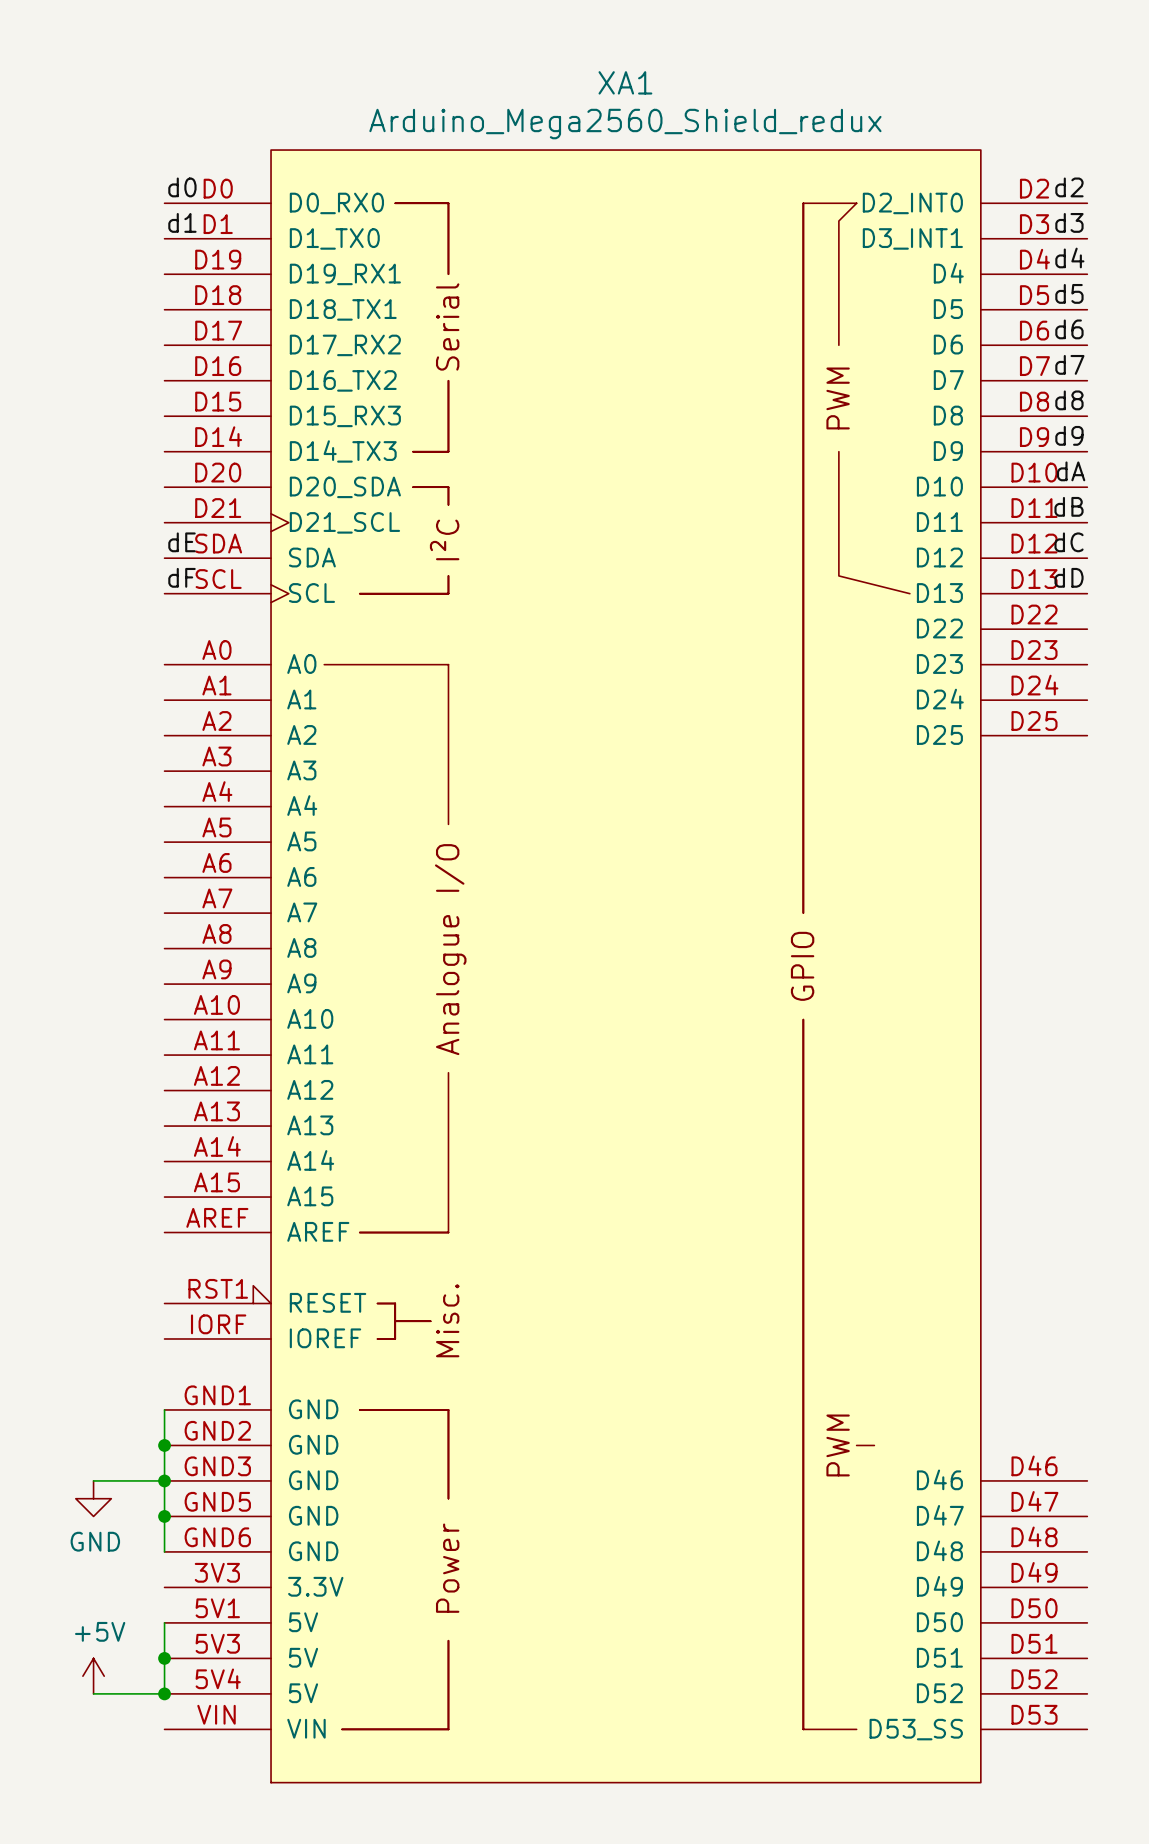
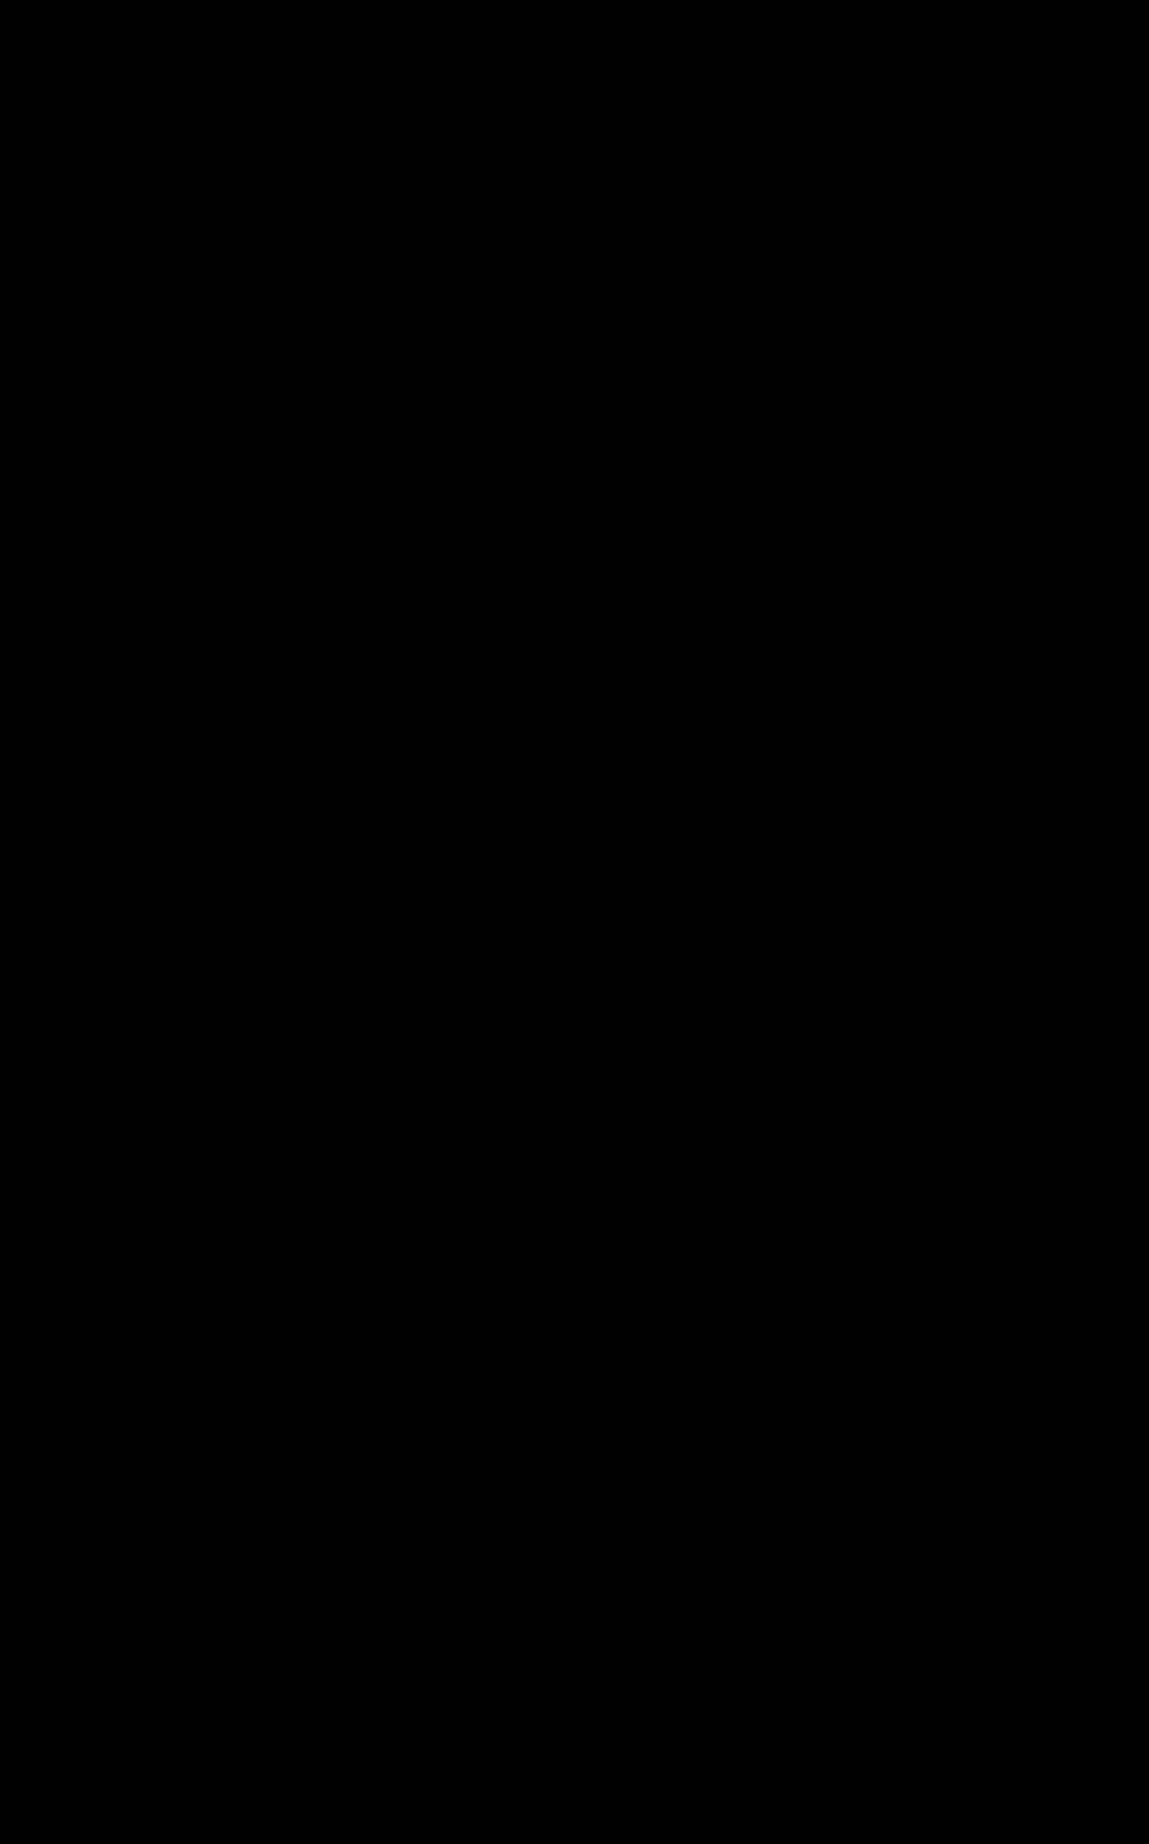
label: d0 (182, 187) -> none
label: d2 (1069, 187) -> none
label: d1 (182, 222) -> none
label: d3 (1069, 222) -> none
label: d4 (1069, 257) -> none
label: d5 (1069, 293) -> none
label: d6 (1069, 329) -> none
label: d7 (1069, 364) -> none
label: d8 (1069, 400) -> none
label: d9 (1069, 435) -> none
label: dA (1071, 471) -> none
label: dB (1069, 506) -> none
label: dE (182, 542) -> none
label: dC (1069, 542) -> none
label: dF (182, 577) -> none
label: dD (1069, 577) -> none
XA1: Arduino_Mega2560_Shield_redux (625, 966) -> none
wire: (164, 1409) (164, 1551) -> none
junction: (164, 1445) -> none
wire: (93, 1480) (164, 1480) -> none
junction: (164, 1480) -> none
power symbol: GND (93, 1498) -> none
junction: (164, 1516) -> none
wire: (164, 1622) (164, 1693) (93, 1693) -> none
junction: (164, 1658) -> none
power symbol: +5V (93, 1676) -> none
junction: (164, 1693) -> none

